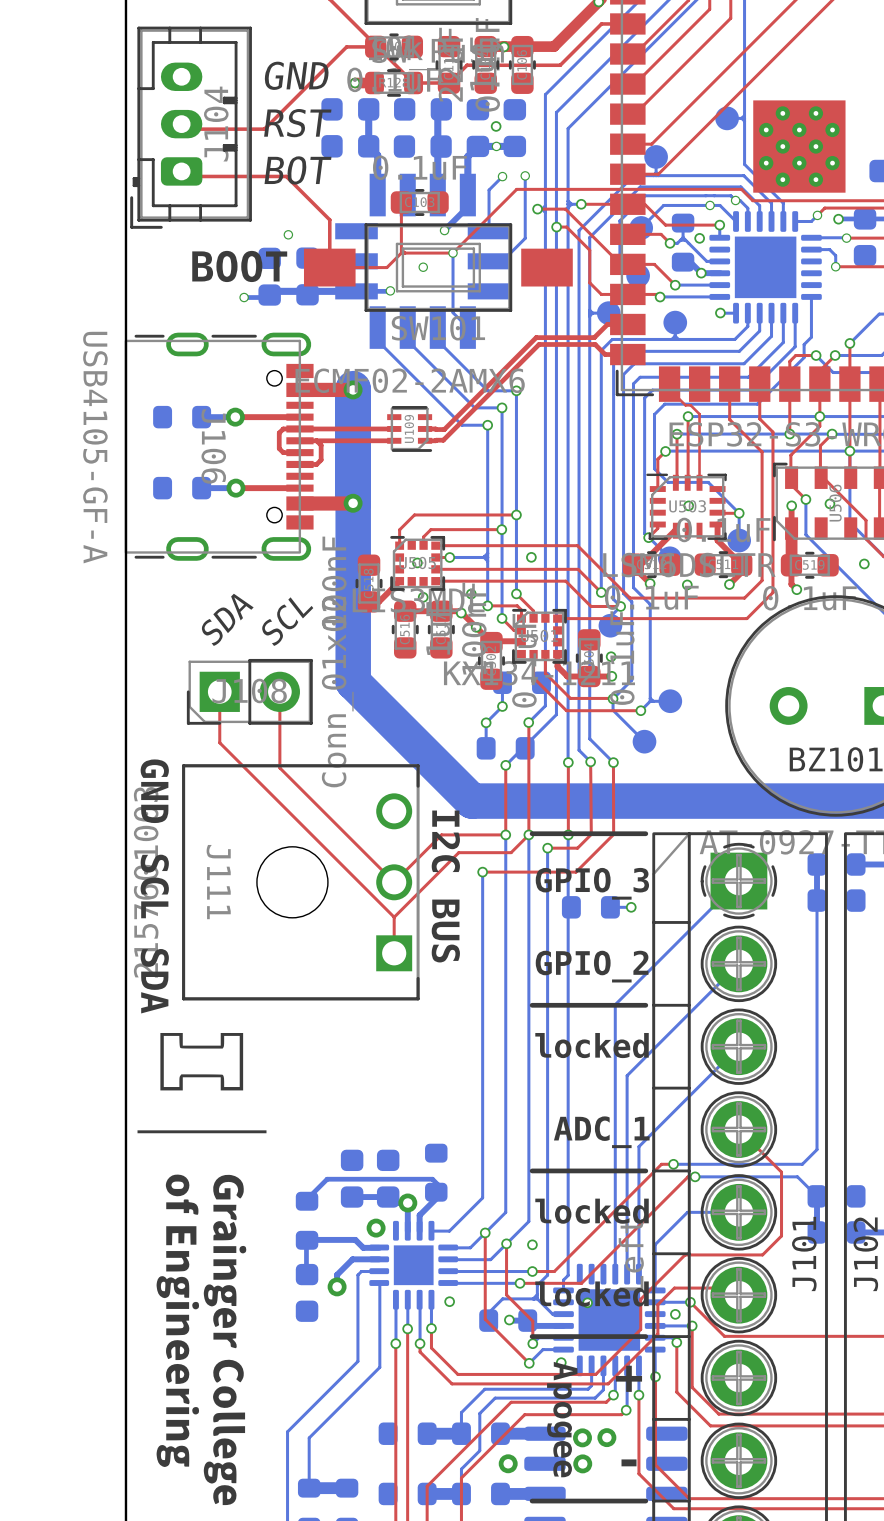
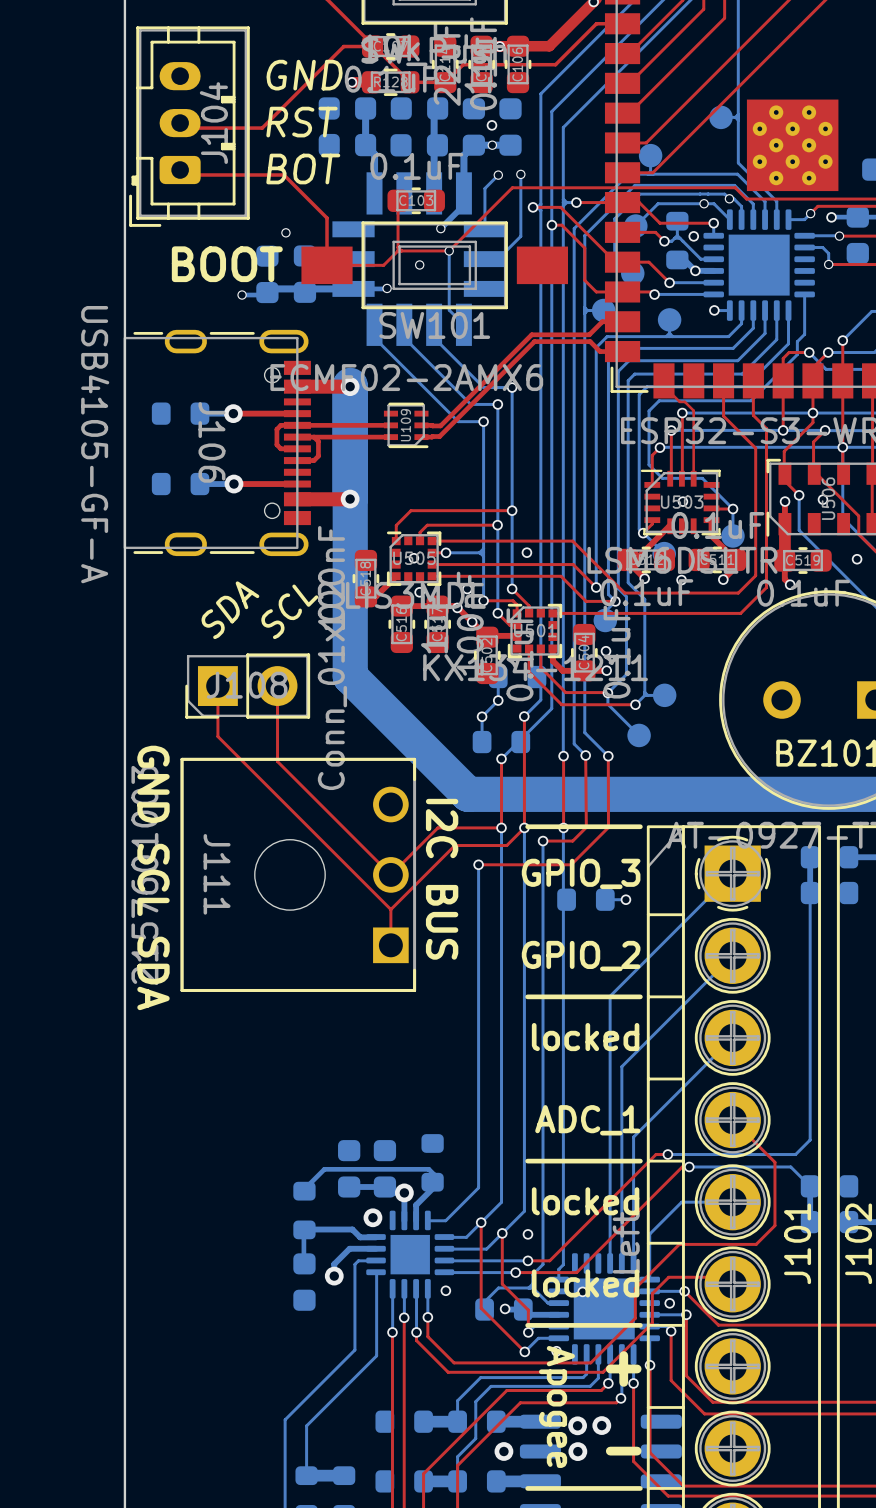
drawing: [137, 1032, 267, 1506] -> none

